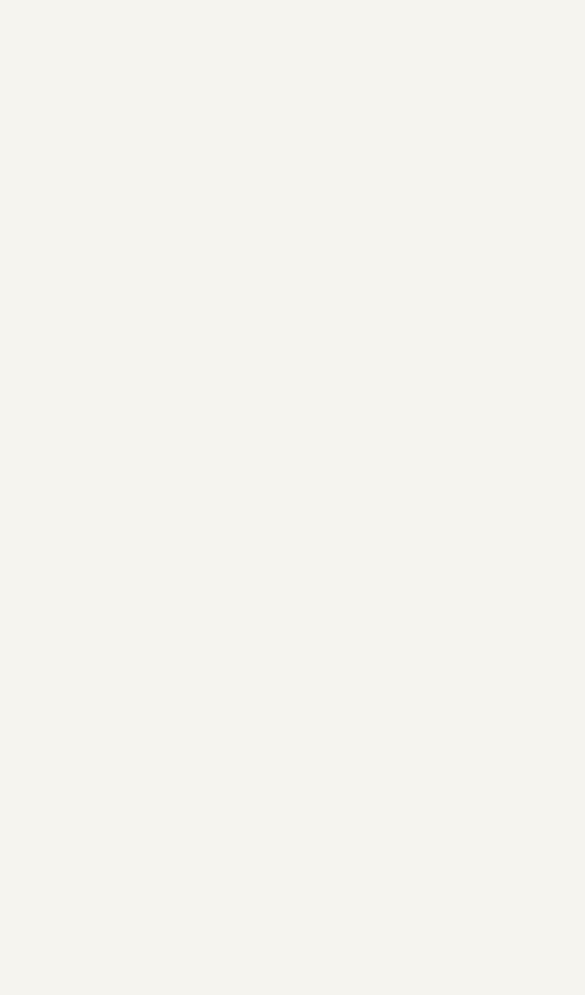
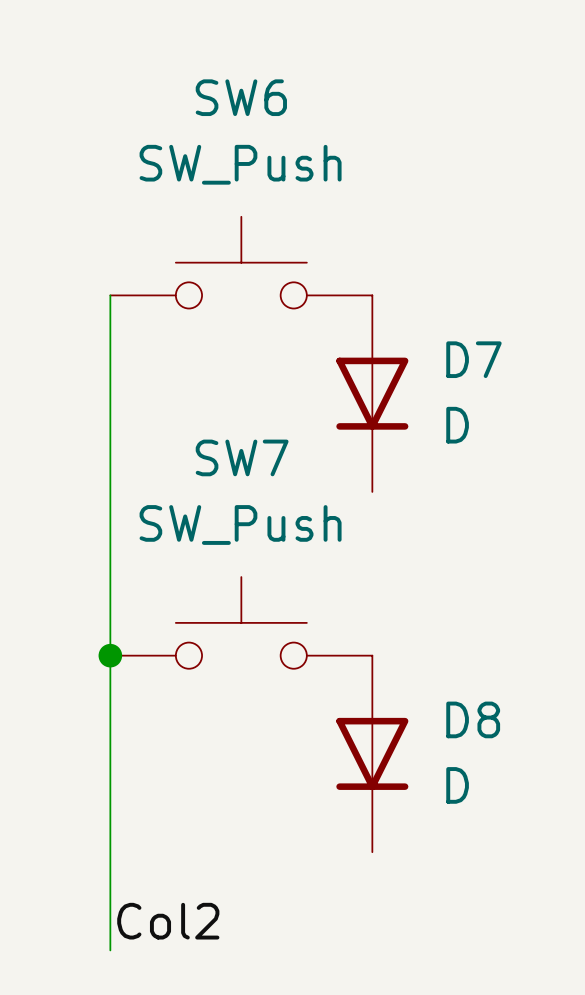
SW6: none -> SW_Push (241, 262)
wire: none -> (110, 295) (110, 950)
D7: none -> D (372, 393)
SW7: none -> SW_Push (241, 622)
junction: none -> (110, 655)
D8: none -> D (372, 753)
label: none -> Col2 (168, 921)

